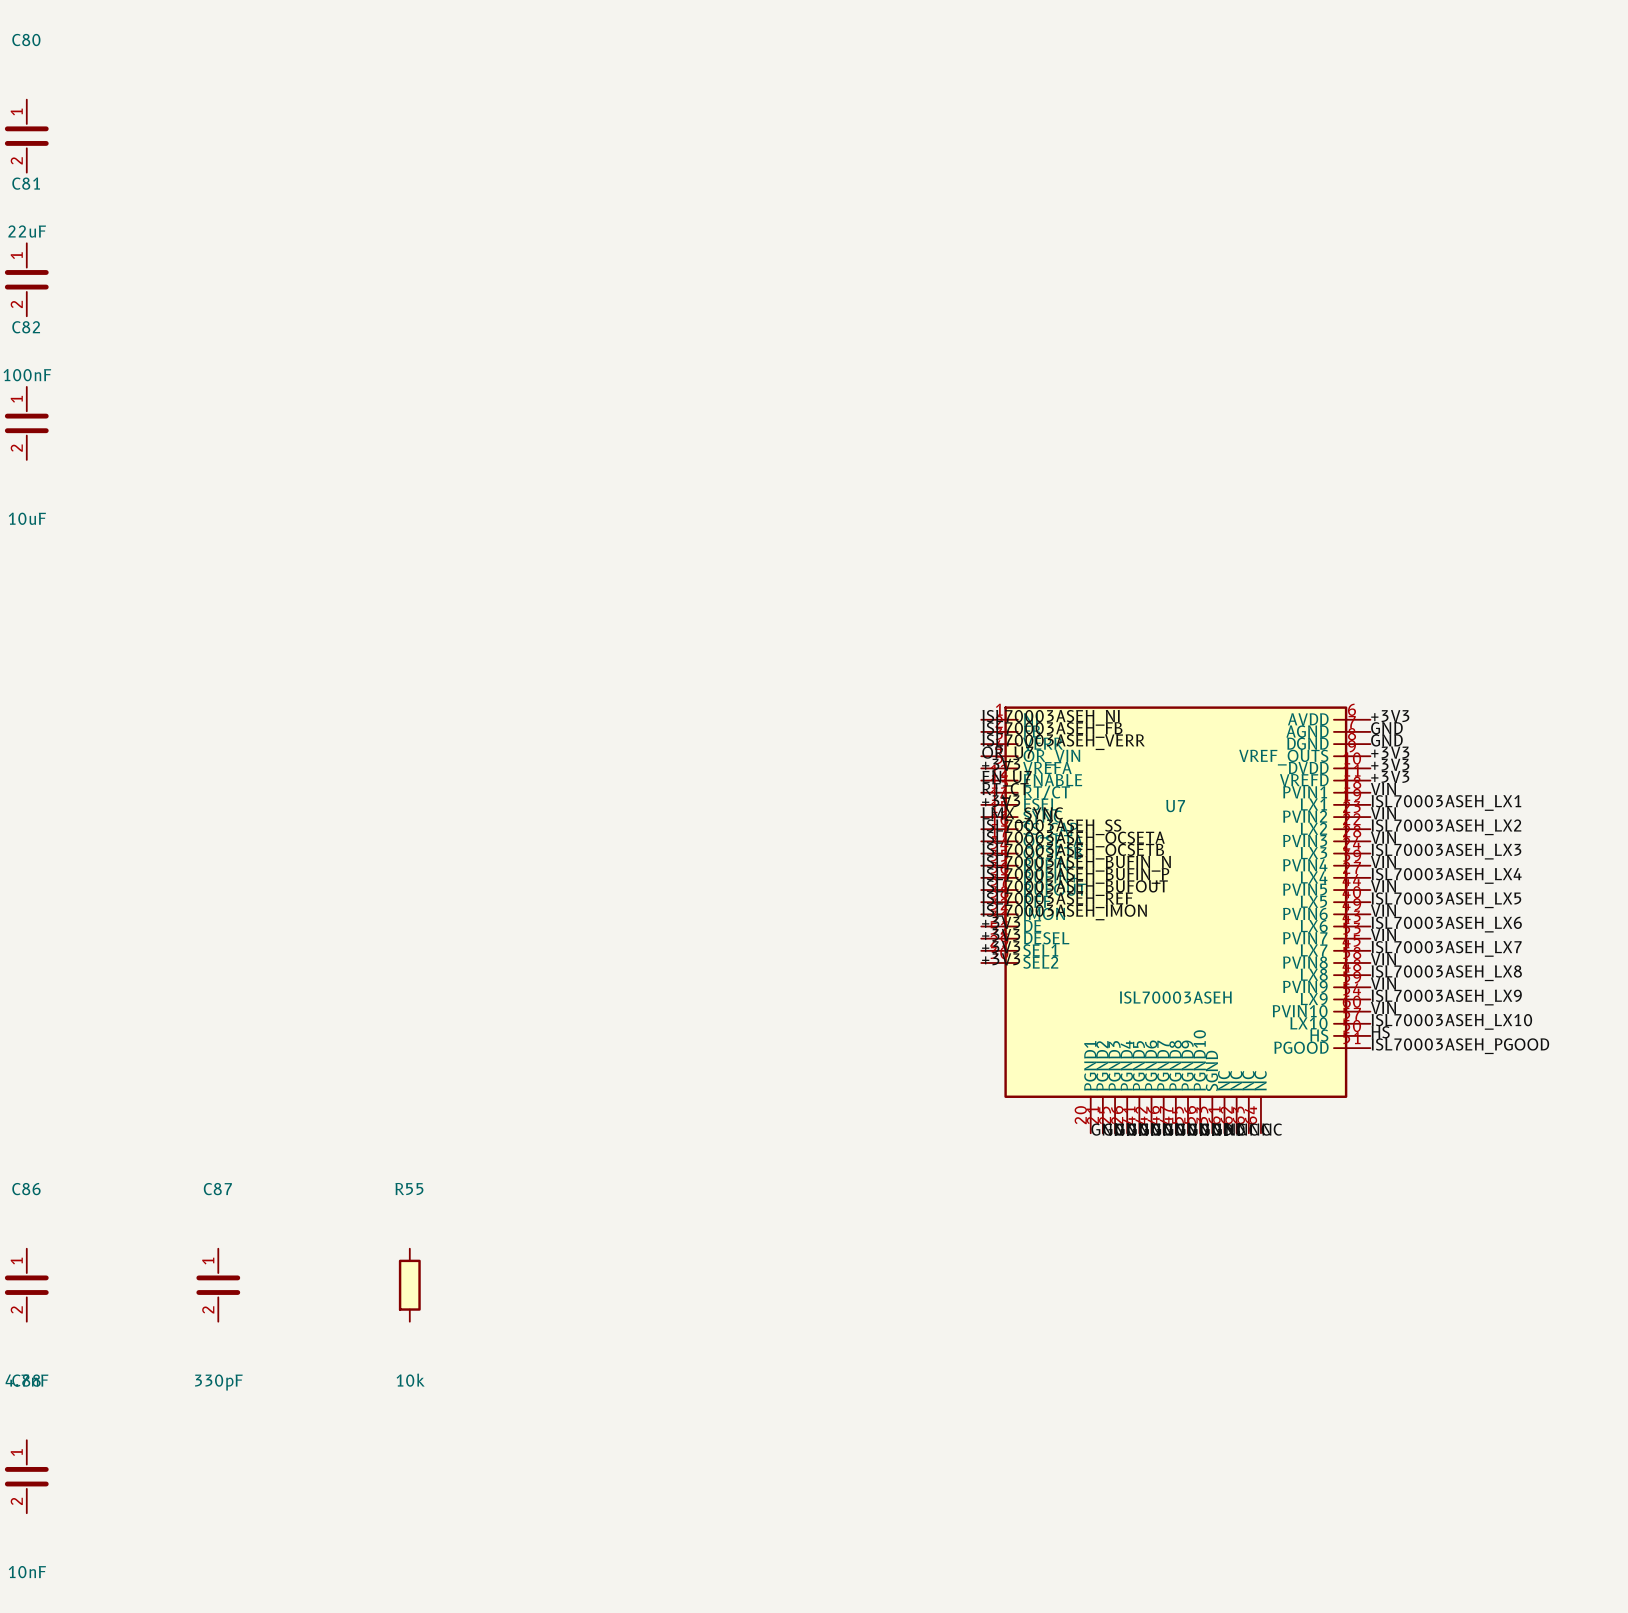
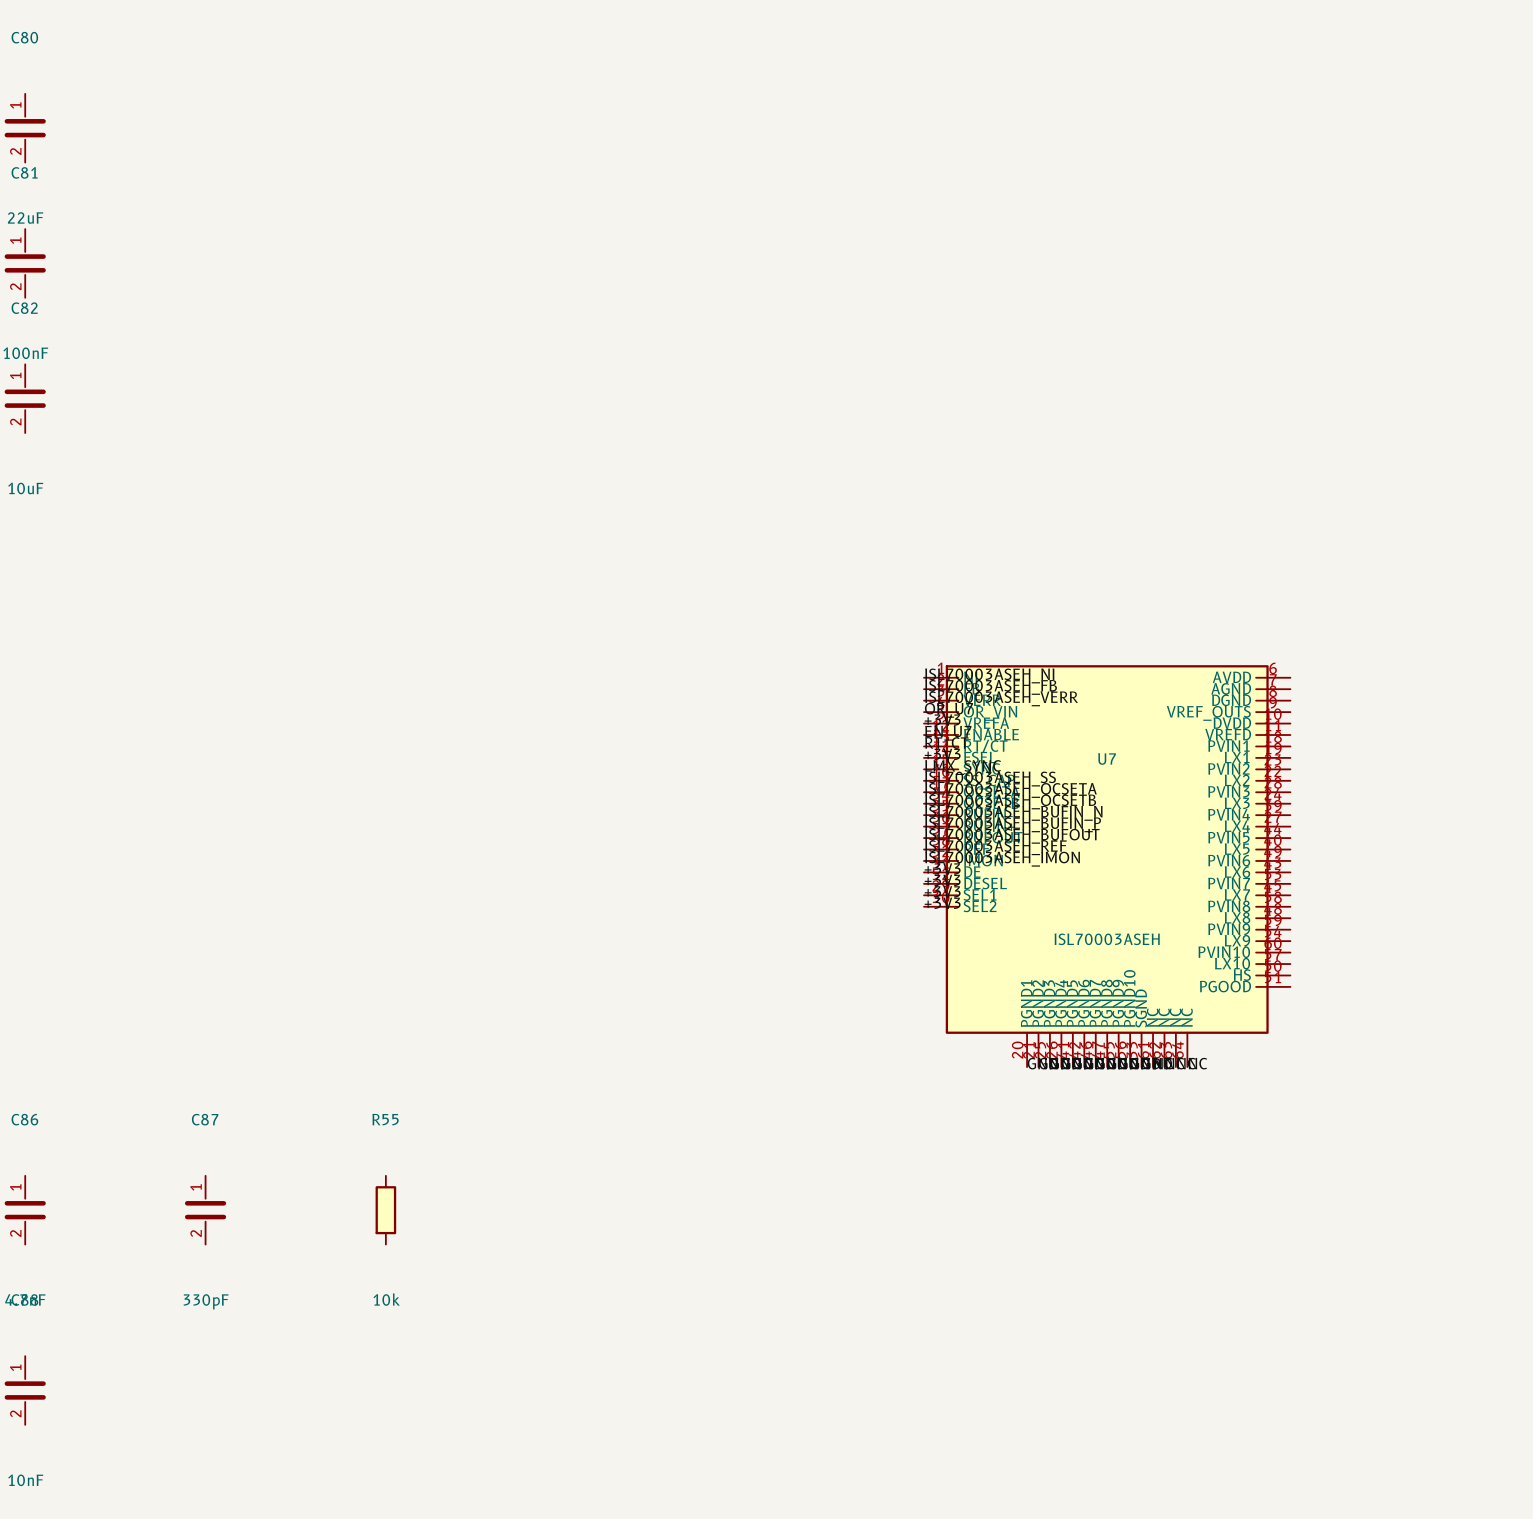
label: +3V3 (1390, 716) -> none
label: GND (1386, 728) -> none
label: GND (1386, 740) -> none
label: +3V3 (1390, 752) -> none
label: +3V3 (1390, 764) -> none
label: +3V3 (1390, 776) -> none
label: VIN (1383, 789) -> none
label: ISL70003ASEH_LX1 (1446, 802) -> none
label: VIN (1383, 813) -> none
label: ISL70003ASEH_LX2 (1446, 827) -> none
label: VIN (1383, 837) -> none
label: ISL70003ASEH_LX3 (1446, 851) -> none
label: VIN (1383, 862) -> none
label: ISL70003ASEH_LX4 (1446, 875) -> none
label: VIN (1383, 886) -> none
label: ISL70003ASEH_LX5 (1446, 900) -> none
label: VIN (1383, 910) -> none
label: ISL70003ASEH_LX6 (1446, 924) -> none
label: VIN (1383, 935) -> none
label: ISL70003ASEH_LX7 (1446, 948) -> none
label: VIN (1383, 959) -> none
label: ISL70003ASEH_LX8 (1446, 973) -> none
label: VIN (1383, 983) -> none
label: ISL70003ASEH_LX9 (1446, 997) -> none
label: VIN (1383, 1007) -> none
label: ISL70003ASEH_LX10 (1451, 1021) -> none
label: HS (1380, 1032) -> none
label: ISL70003ASEH_PGOOD (1460, 1046) -> none

